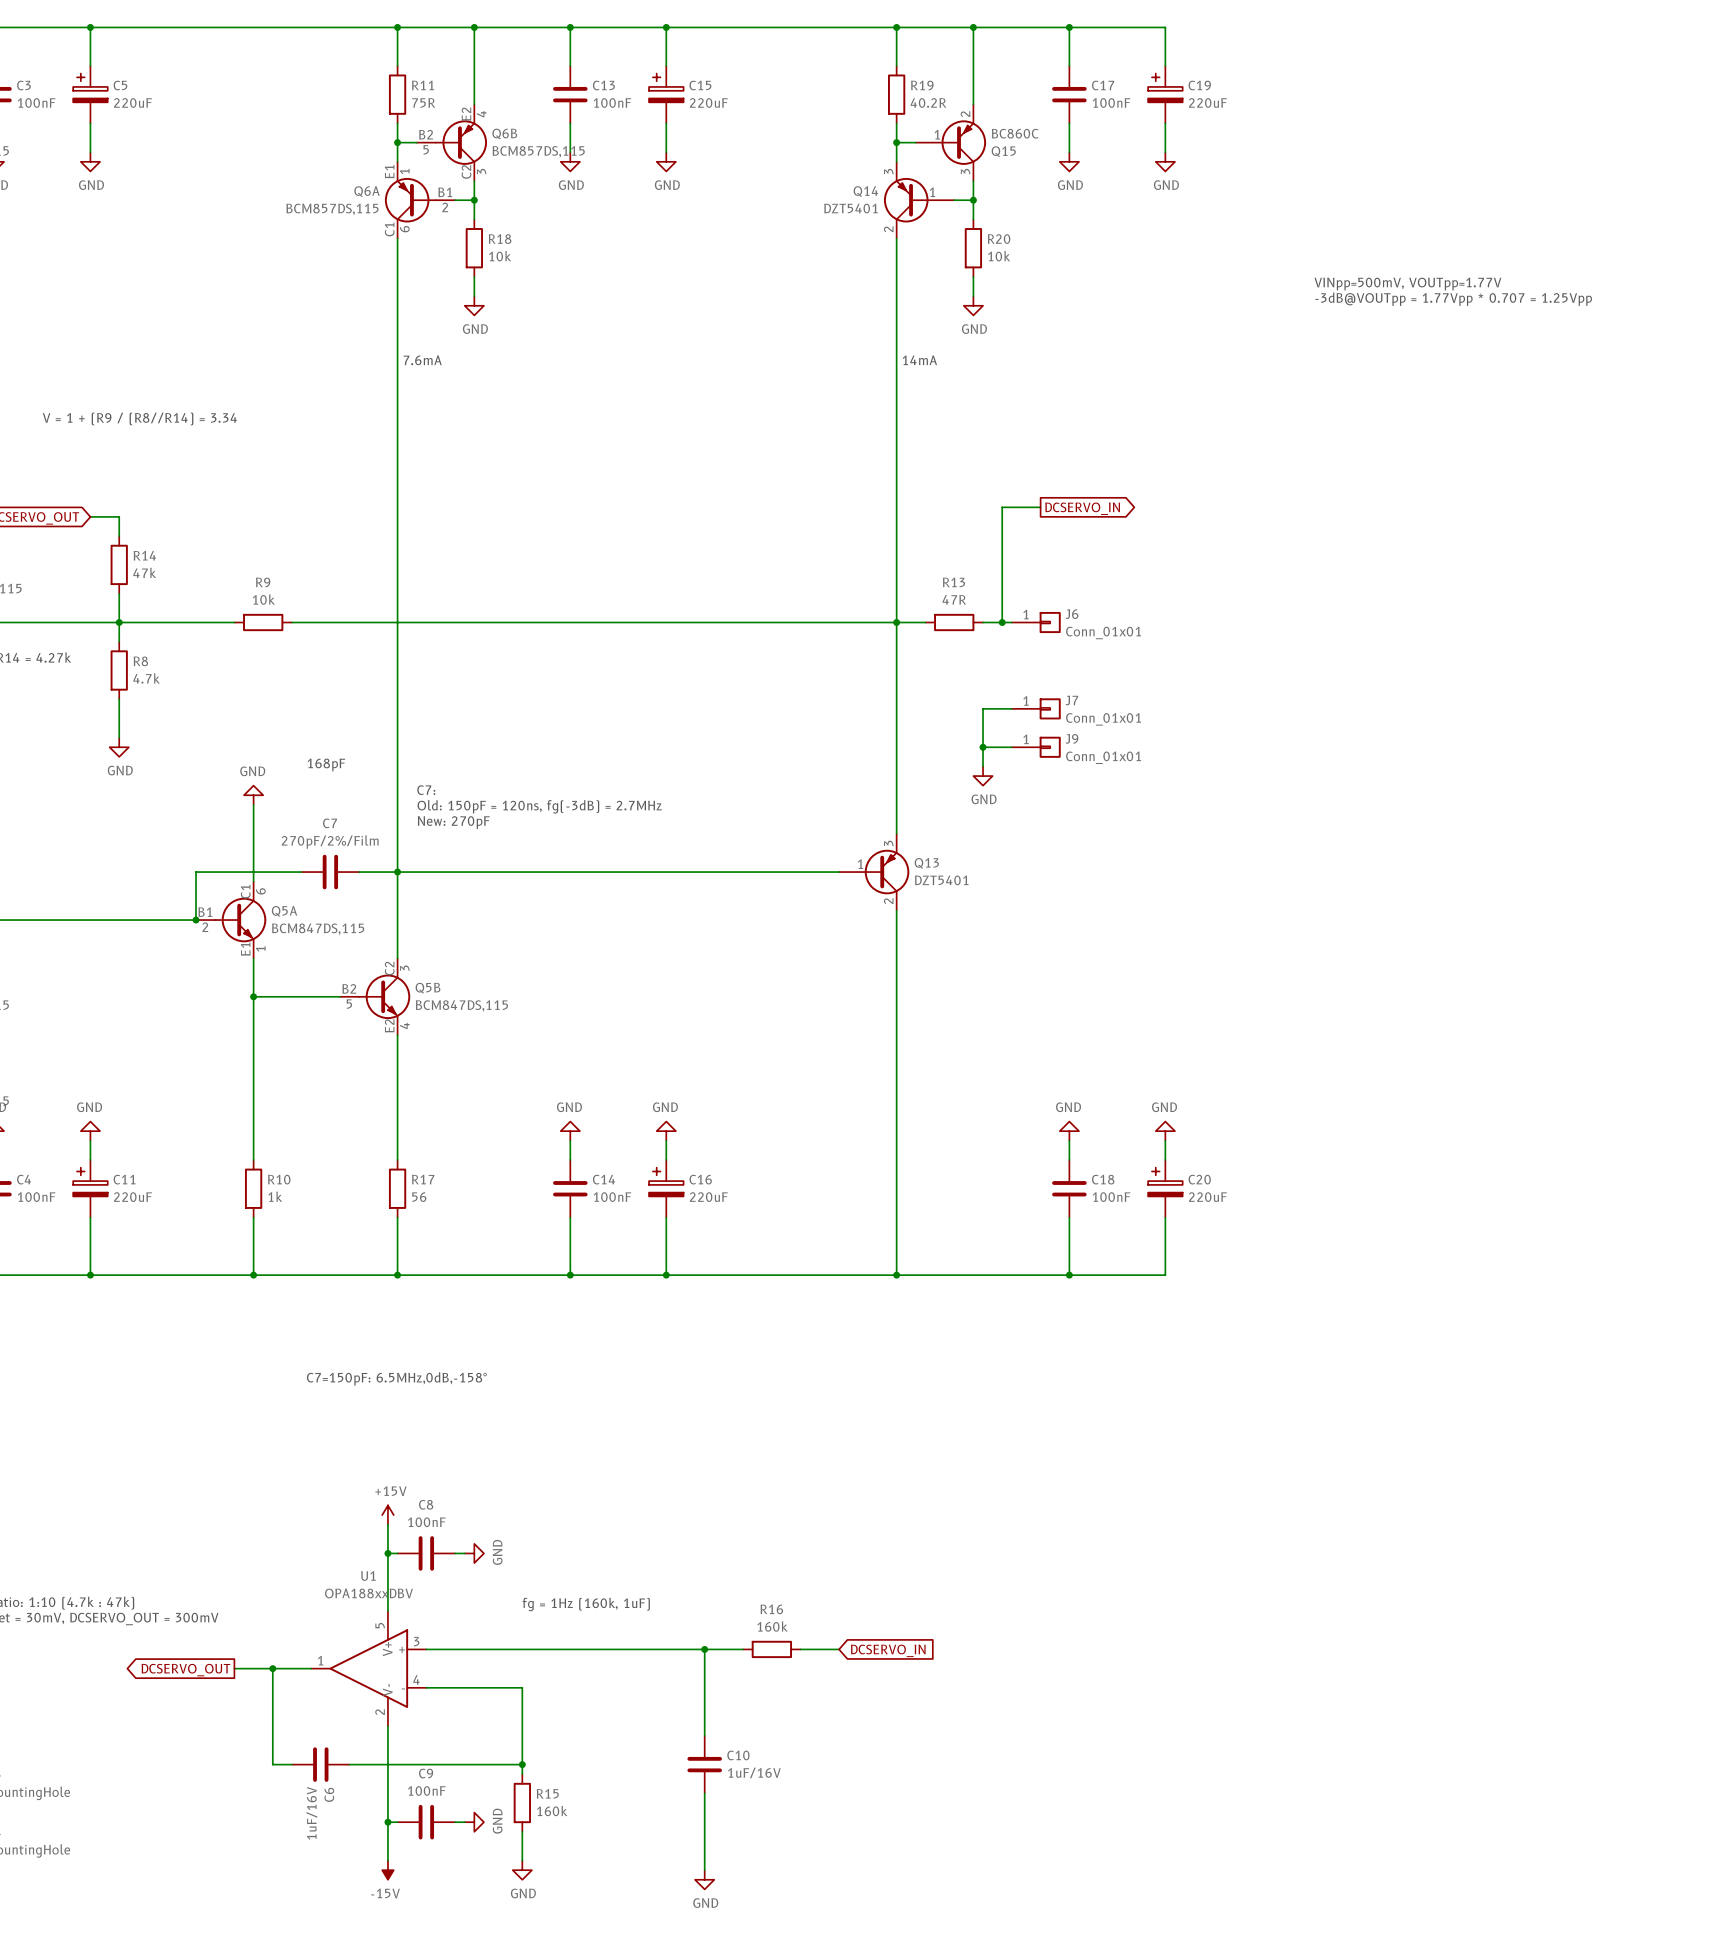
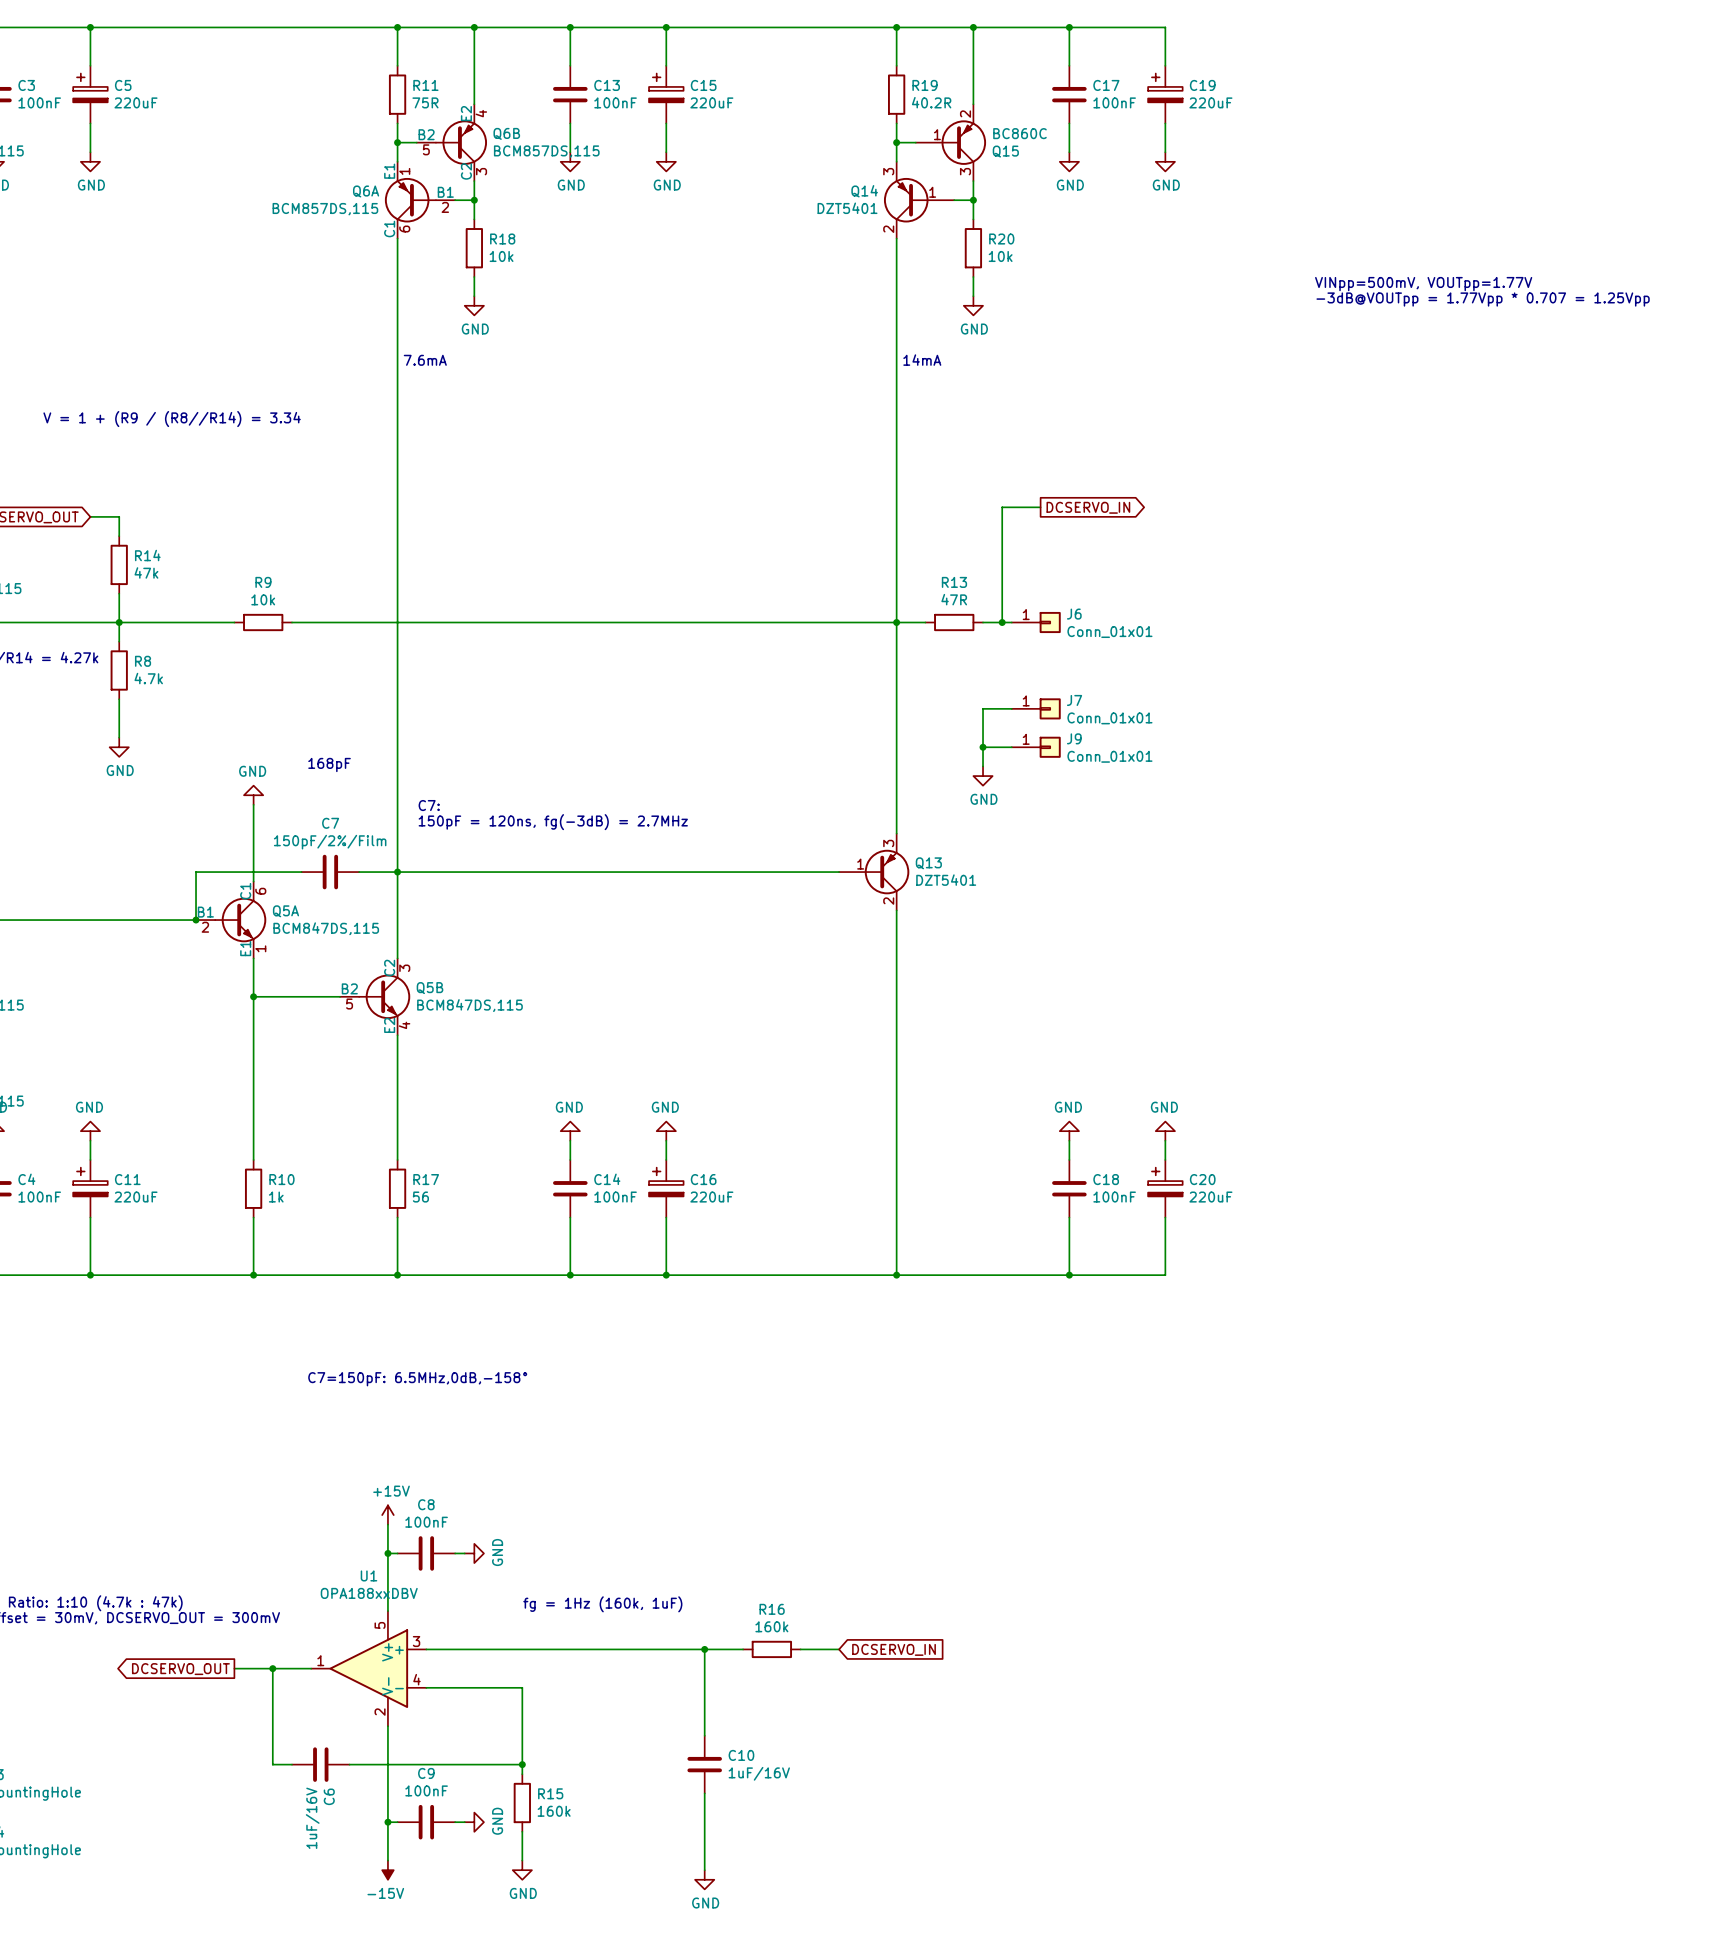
text: C7: (426, 790) -> none
text: Old: 150pF = 120ns, fg(-3dB) = 2.7MHz (539, 806) -> C7: (429, 805)
text: New: 270pF (453, 822) -> 150pF = 120ns, fg(-3dB) = 2.7MHz (553, 822)
C7 value: 270pF/2%/Film (330, 842) -> 150pF/2%/Film (330, 842)

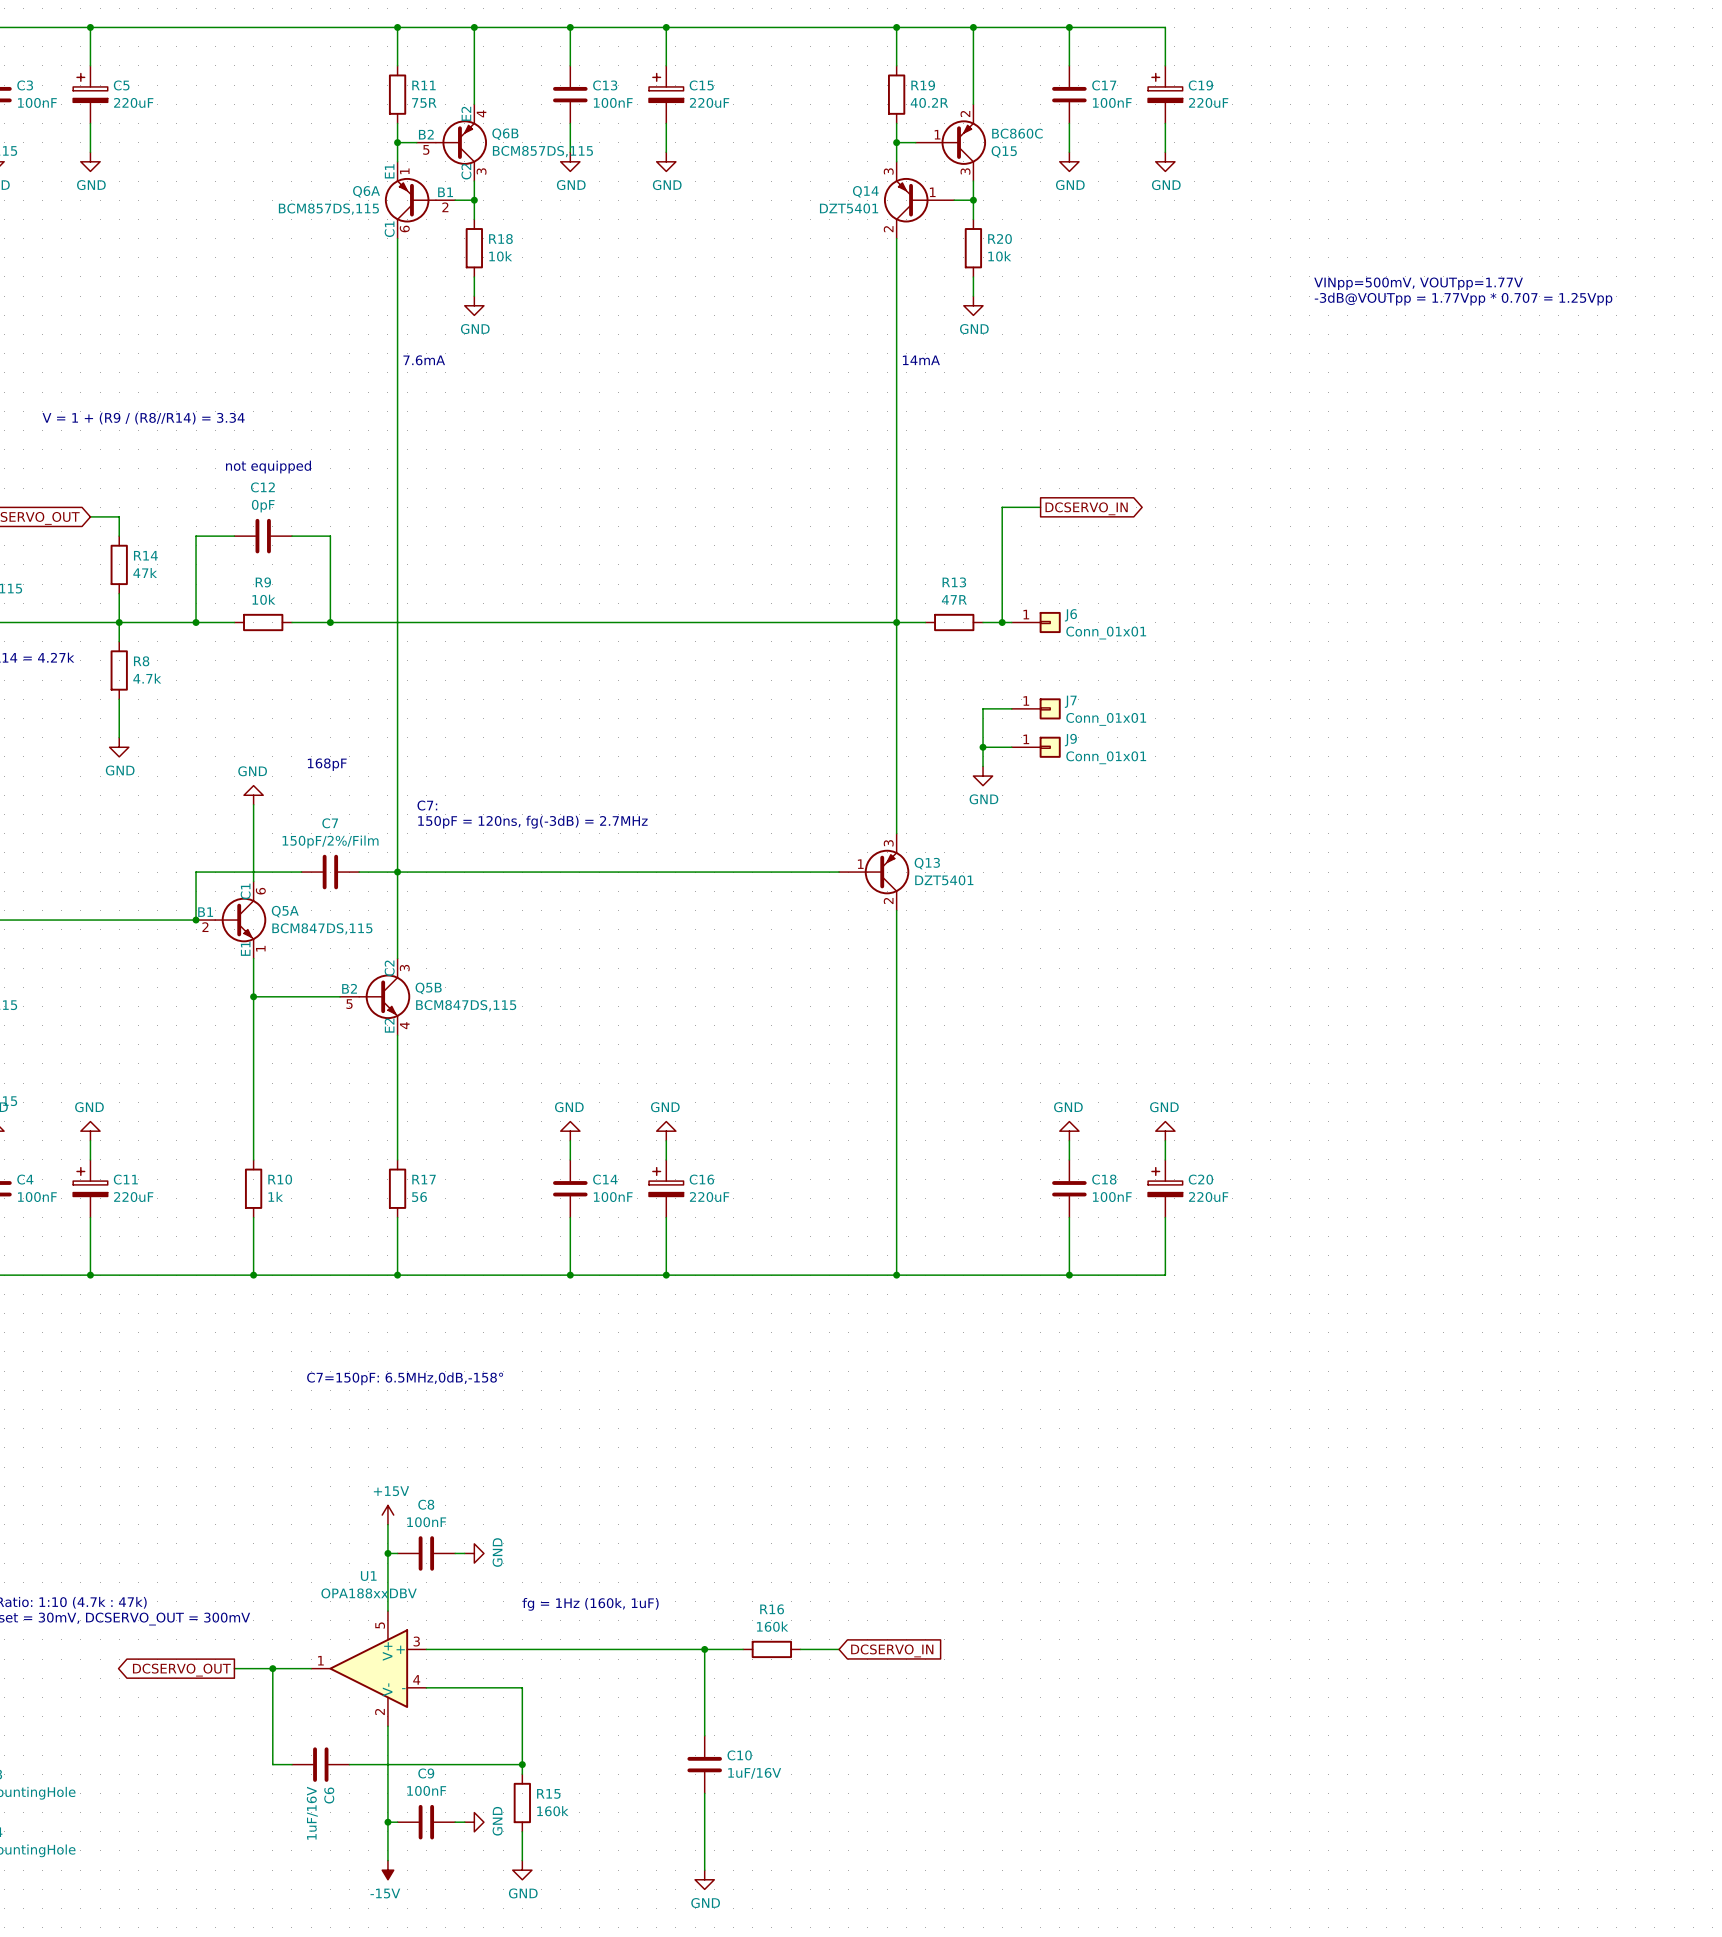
text: none -> not equipped (268, 467)
wire: none -> (234, 536) (196, 536) (196, 622)
C12: none -> 0pF (263, 536)
wire: none -> (291, 536) (330, 536) (330, 622)
junction: none -> (196, 622)
junction: none -> (330, 622)

